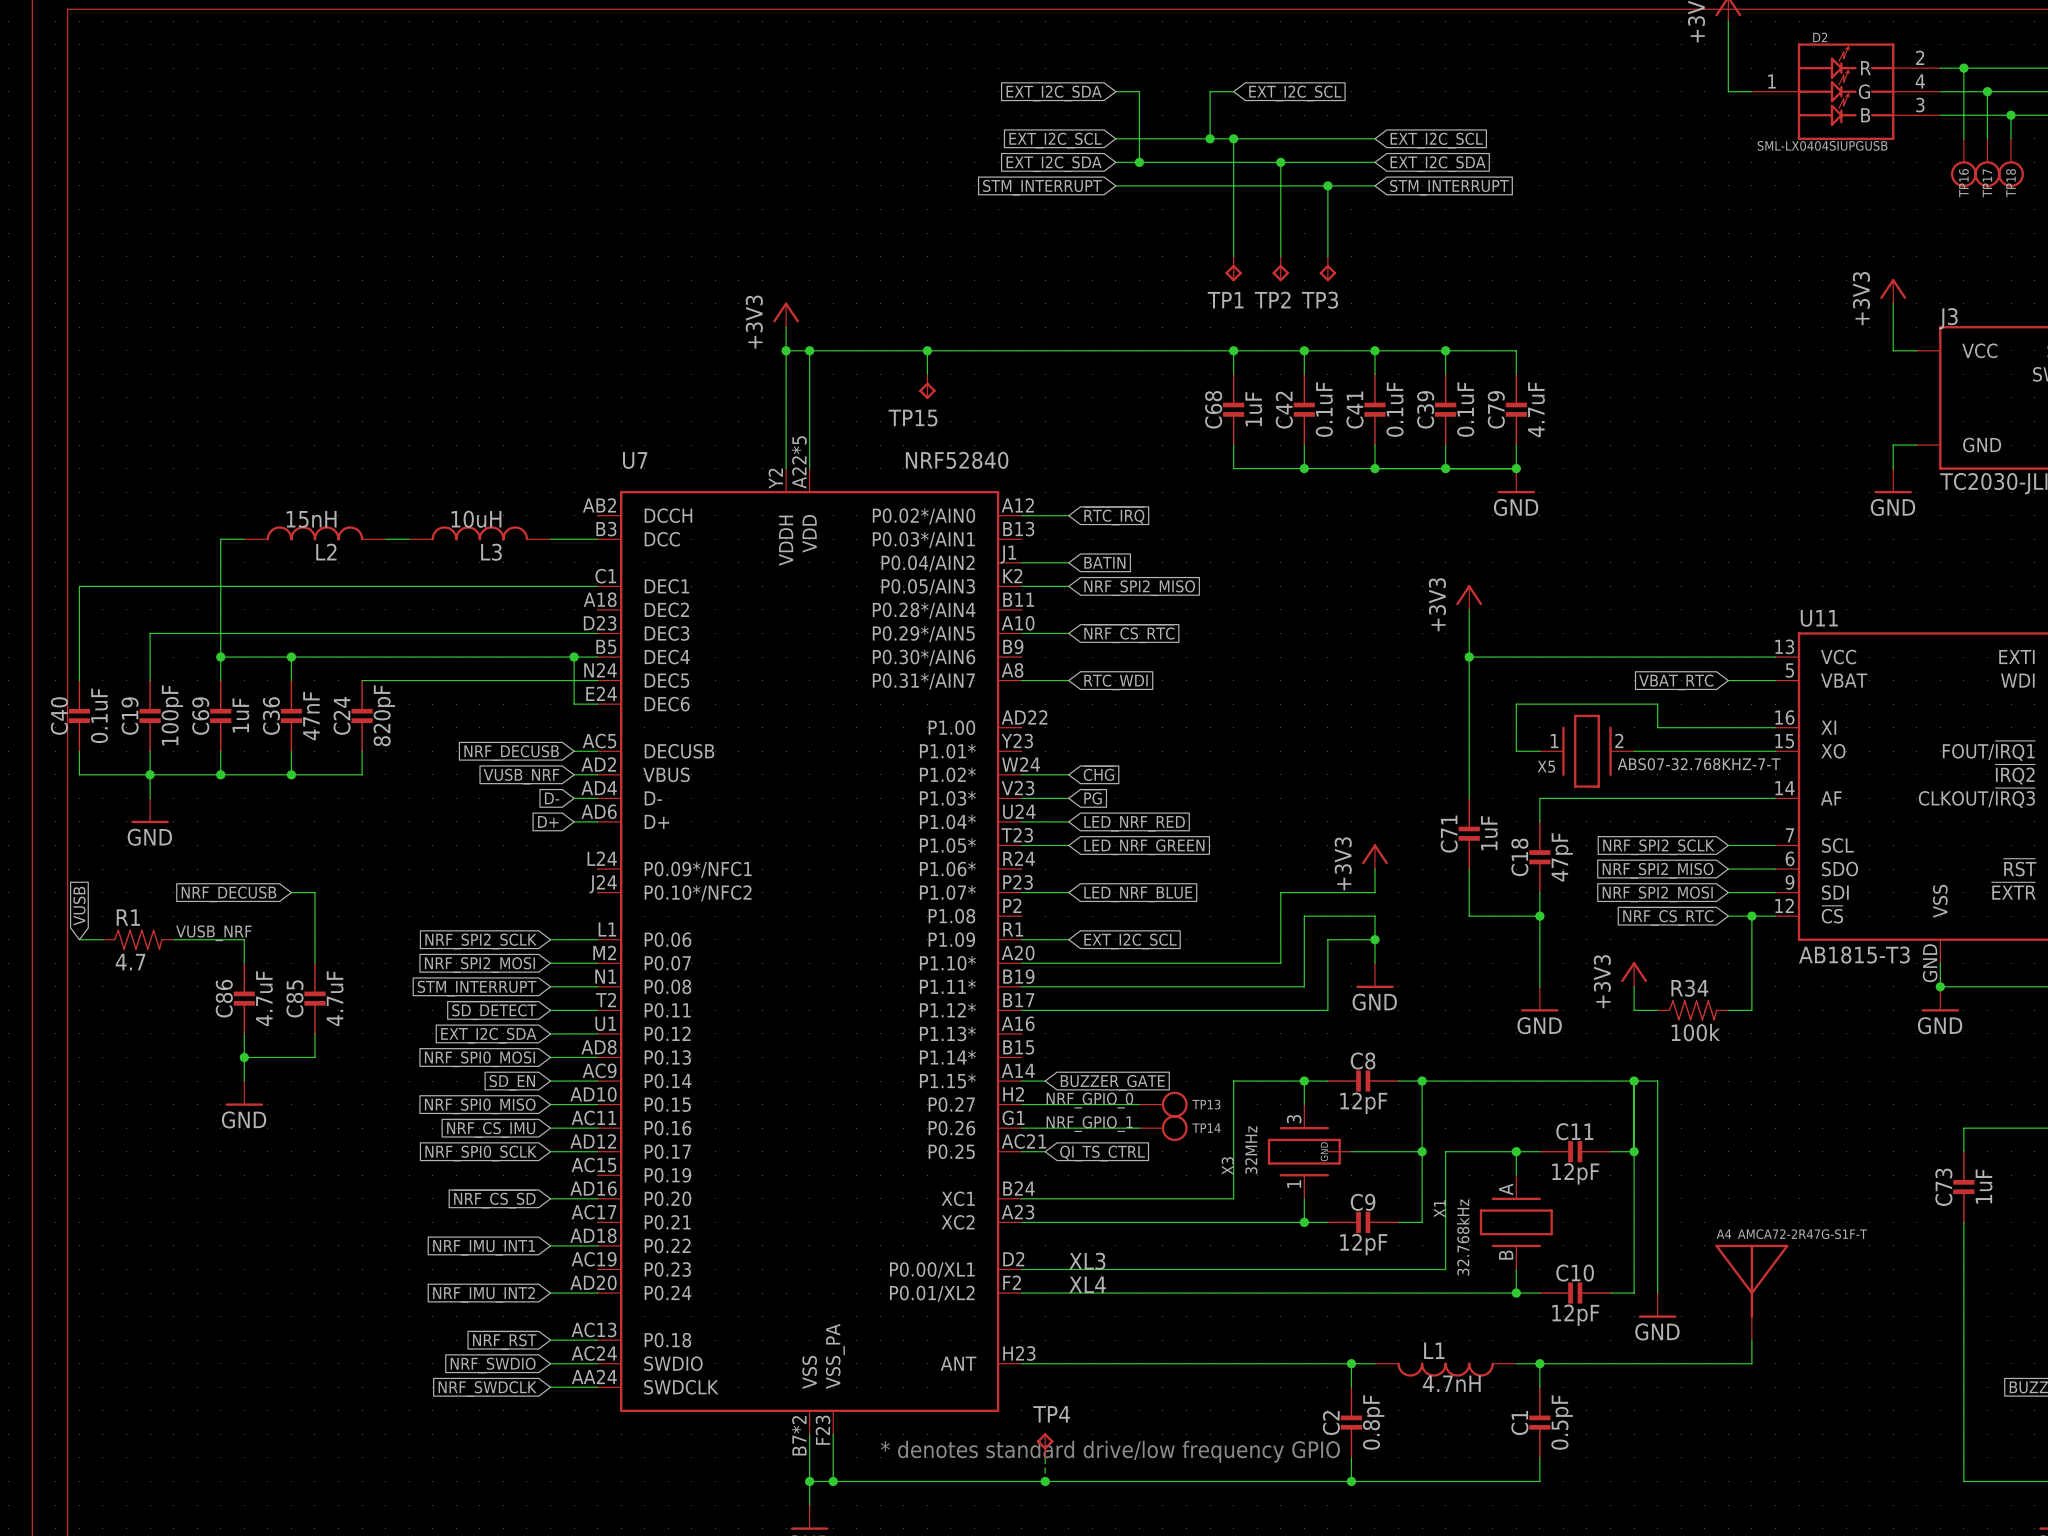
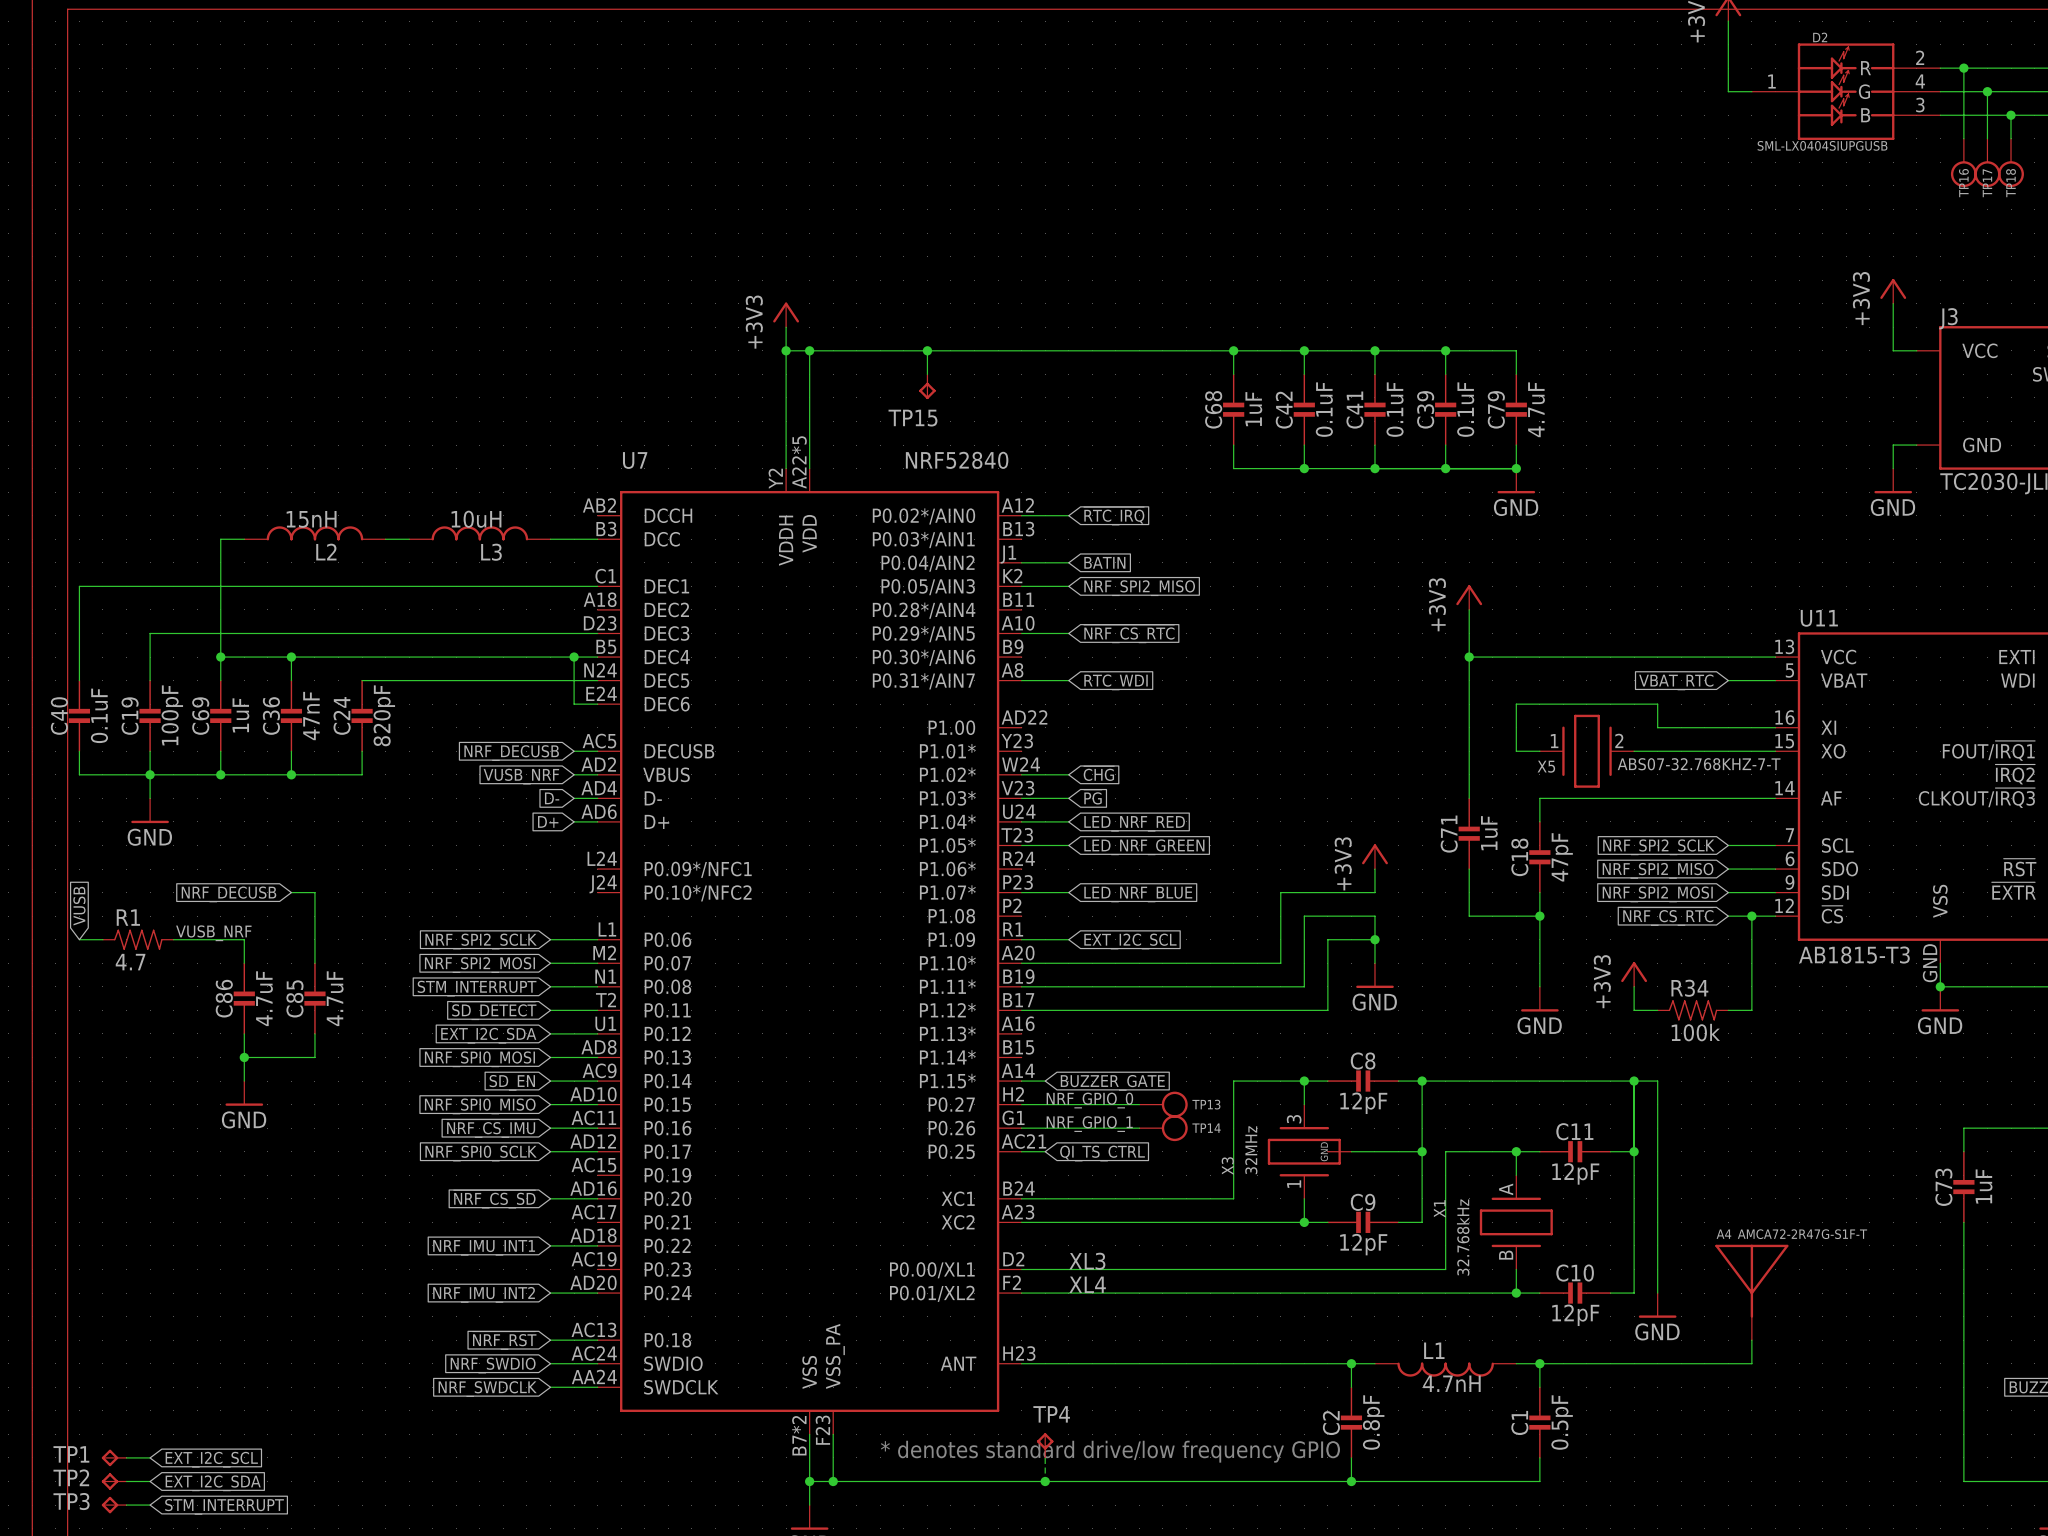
wire: (1115, 91) (1139, 91) (1139, 162) -> none
wire: (1233, 91) (1210, 91) (1210, 138) -> none
global label: EXT_I2C_SDA (1054, 93) -> none
global label: EXT_I2C_SCL (1295, 93) -> none
wire: (1115, 138) (1374, 138) -> none
junction: (1210, 138) -> none
wire: (1233, 138) (1233, 256) -> none
junction: (1233, 138) -> none
global label: EXT_I2C_SCL (1055, 140) -> none
global label: EXT_I2C_SCL (1436, 140) -> none
wire: (1115, 162) (1374, 162) -> none
junction: (1139, 162) -> none
wire: (1280, 162) (1280, 256) -> none
junction: (1280, 162) -> none
global label: EXT_I2C_SDA (1054, 164) -> none
global label: EXT_I2C_SDA (1438, 164) -> none
wire: (1115, 185) (1374, 185) -> none
wire: (1327, 185) (1327, 256) -> none
junction: (1327, 185) -> none
global label: STM_INTERRUPT (1042, 187) -> none
global label: STM_INTERRUPT (1449, 187) -> none
TP1 position: (1233, 268) -> (114, 1457)
TP2 position: (1280, 268) -> (114, 1481)
TP3 position: (1327, 268) -> (114, 1505)
TP1 rotation: 0° (1233, 273) -> 90° clockwise (110, 1457)
TP2 rotation: 0° (1280, 273) -> 90° clockwise (110, 1481)
TP3 rotation: 0° (1327, 273) -> 90° clockwise (110, 1505)
wire: none -> (126, 1457) (150, 1457)
global label: none -> EXT_I2C_SCL (211, 1459)
wire: none -> (126, 1481) (150, 1481)
global label: none -> EXT_I2C_SDA (213, 1483)
wire: none -> (126, 1505) (150, 1505)
global label: none -> STM_INTERRUPT (224, 1506)

